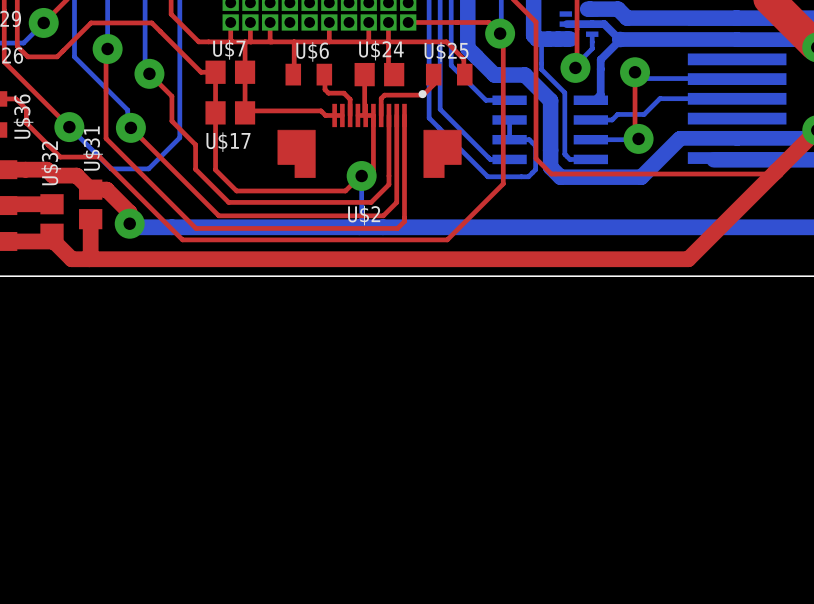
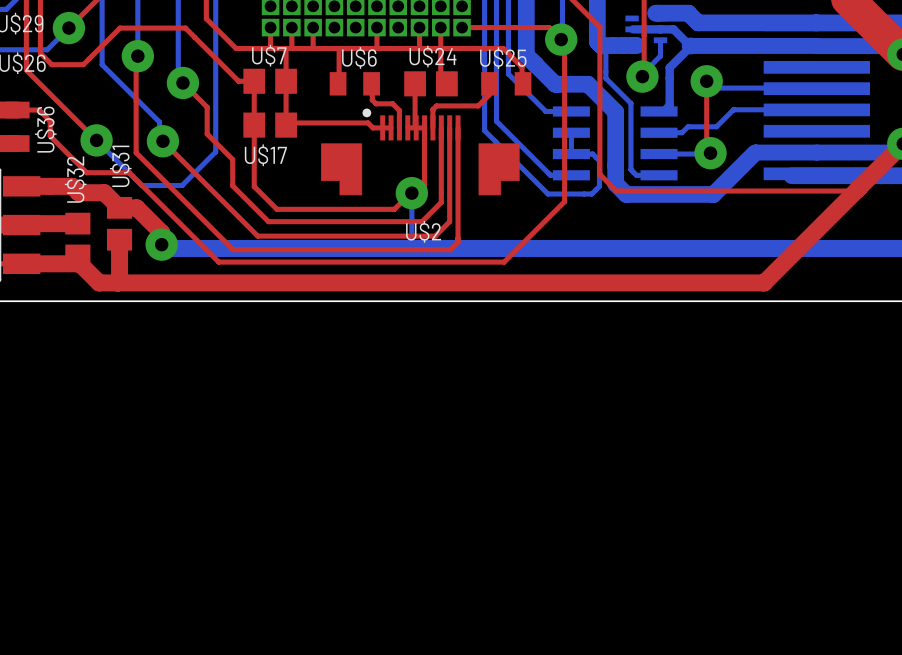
U$2 footprint: [277, 90, 462, 178] -> [321, 108, 520, 196]

